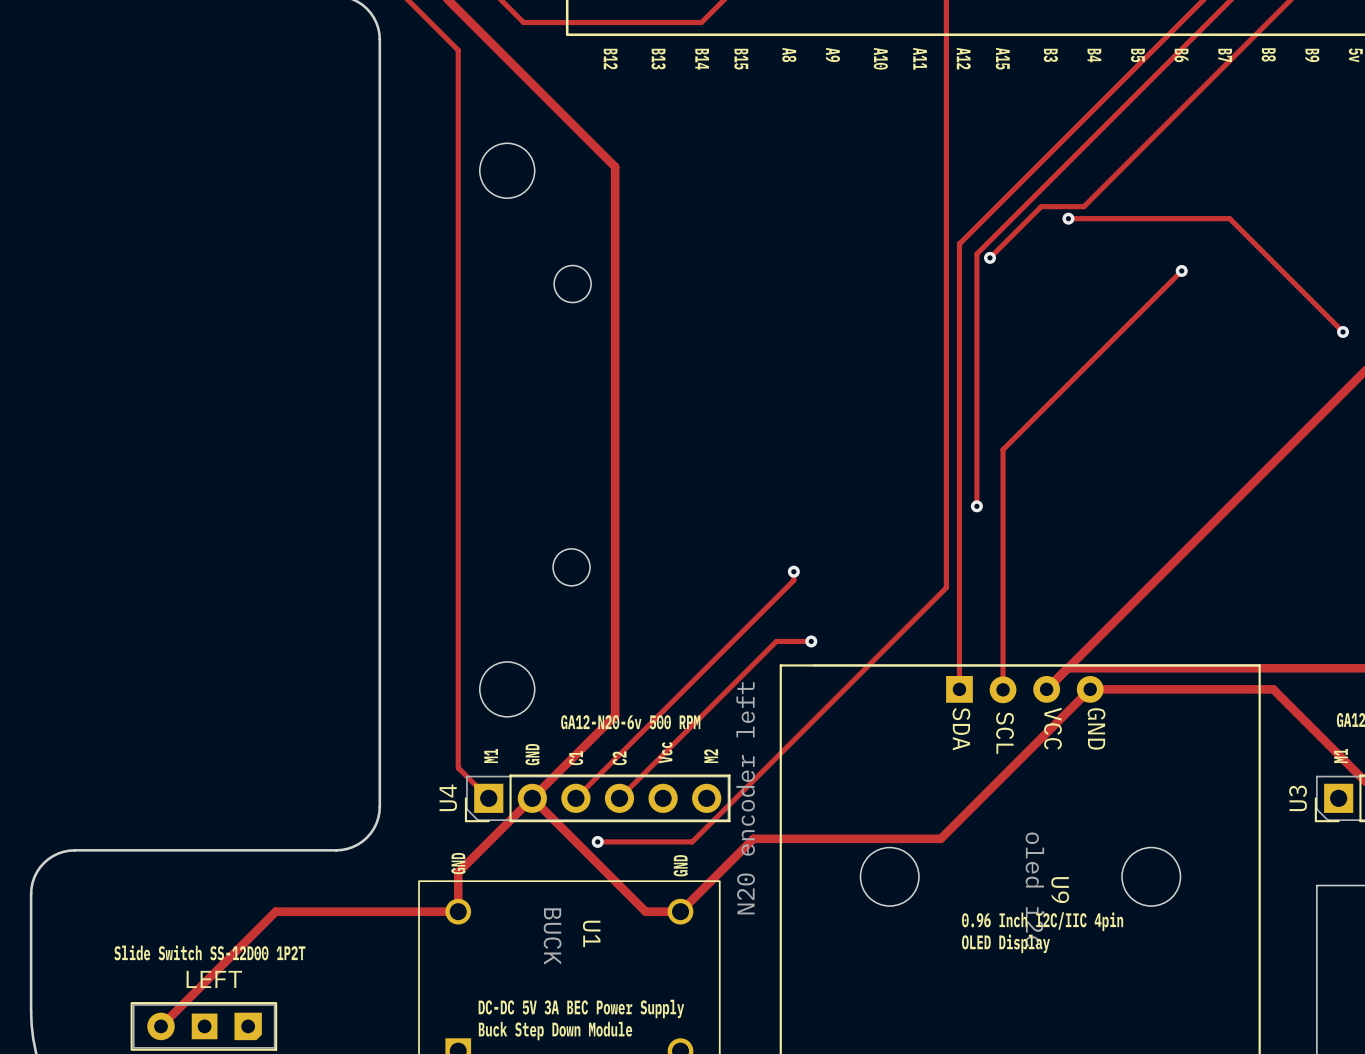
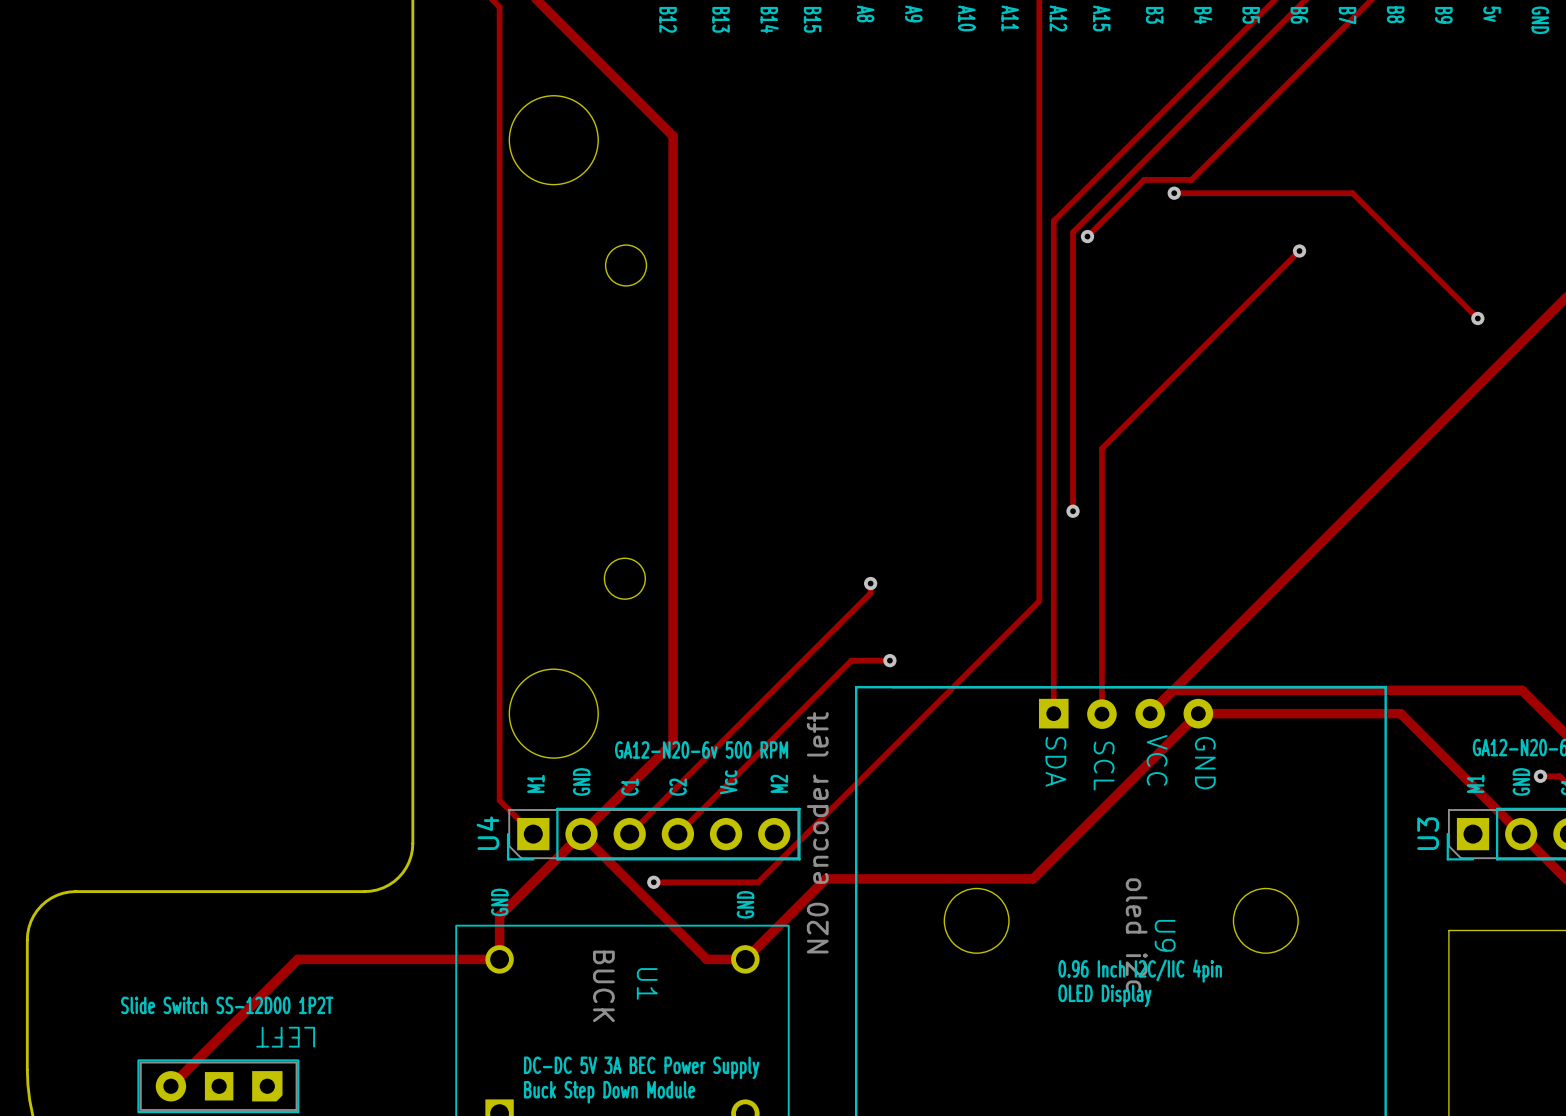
round board edge size: [479, 142, 536, 199] -> [508, 95, 599, 186]
round board edge size: [479, 661, 536, 718] -> [508, 668, 599, 759]
part text rotation: 0° (214, 979) -> 180° (285, 1037)

